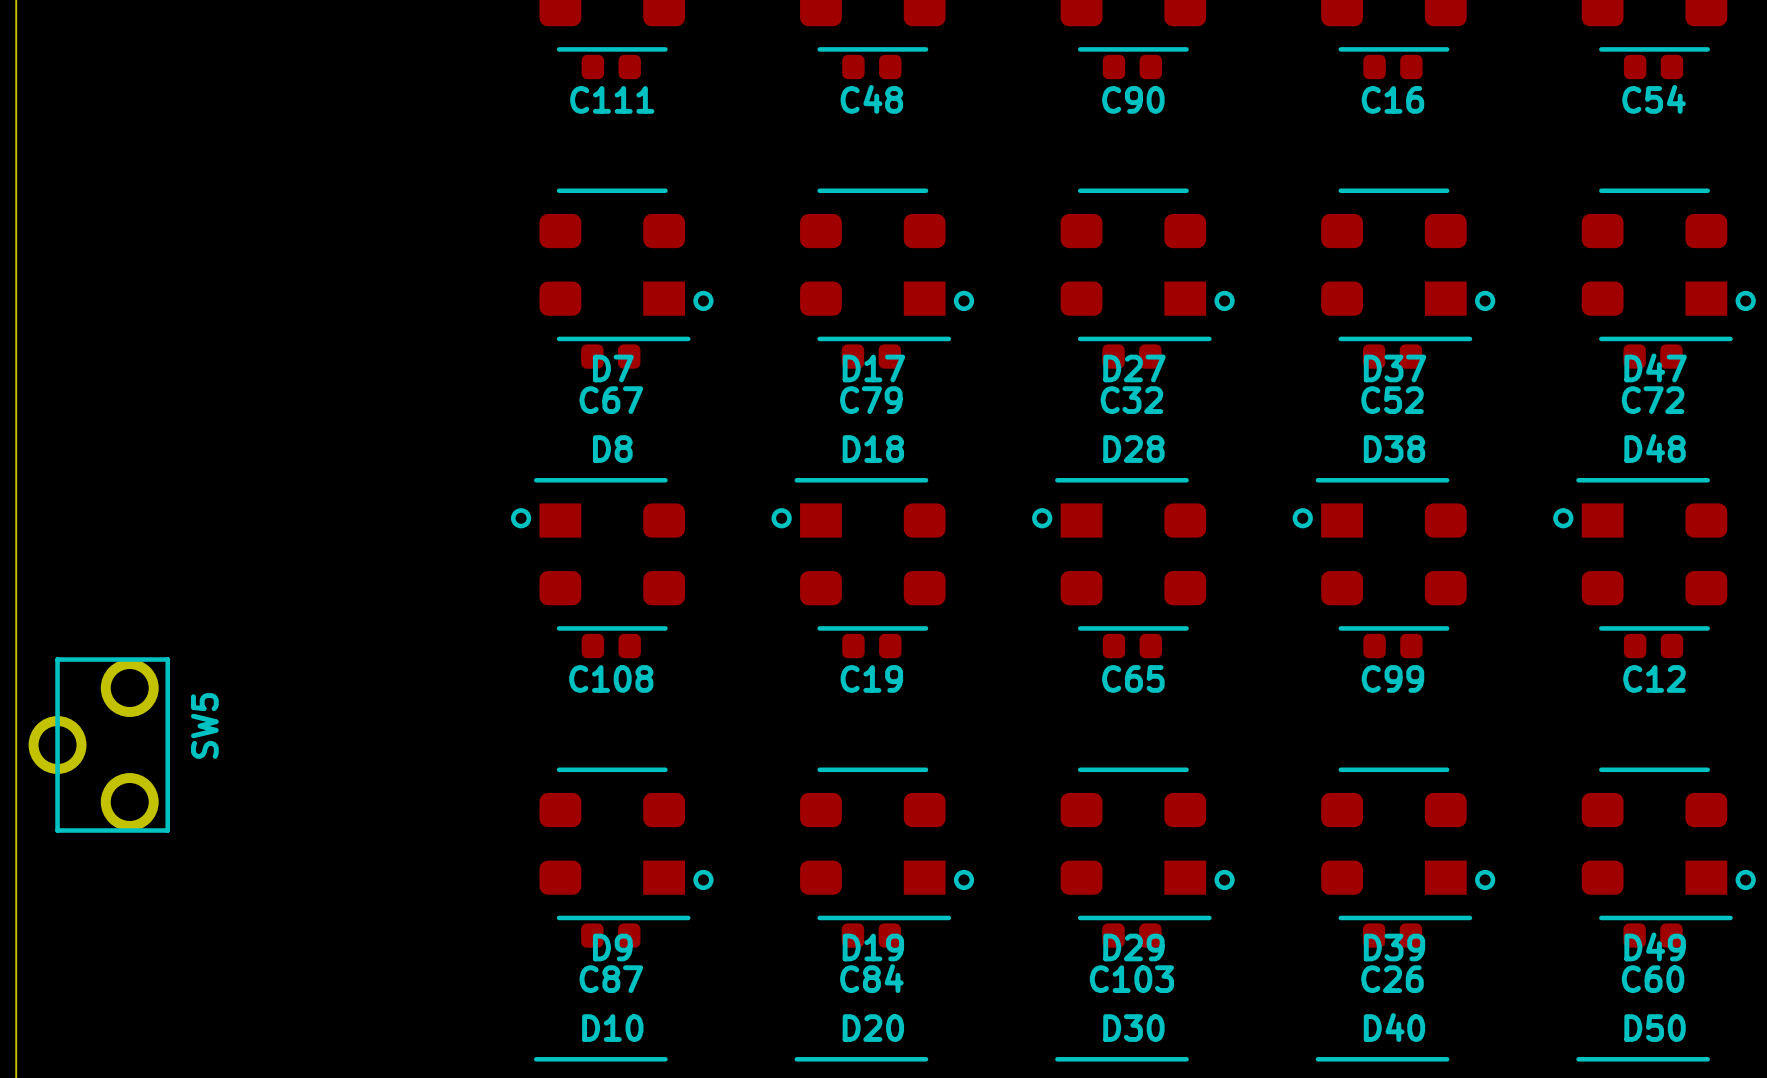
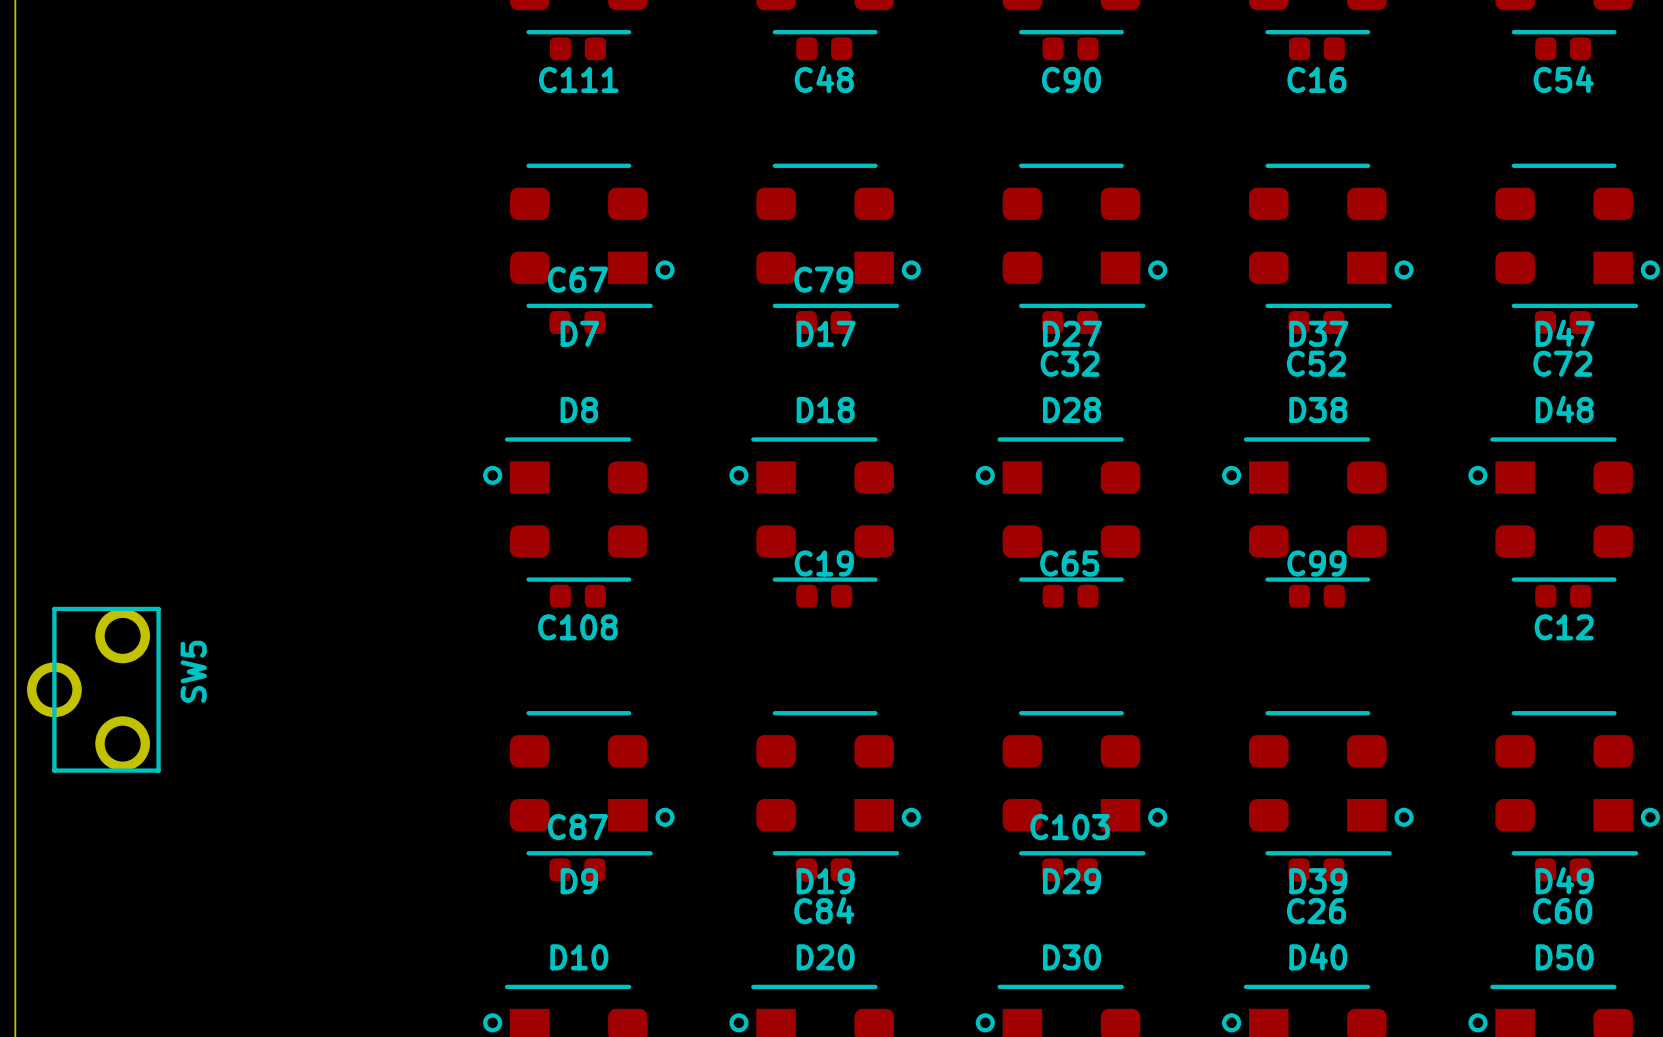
C67 name position: C67 (611, 400) -> C67 (577, 279)
C79 name position: C79 (871, 400) -> C79 (823, 279)
C19 name position: C19 (871, 678) -> C19 (824, 563)
C65 name position: C65 (1133, 678) -> C65 (1069, 563)
C99 name position: C99 (1392, 678) -> C99 (1316, 563)
C87 name position: C87 (611, 979) -> C87 (577, 827)
C103 name position: C103 (1131, 979) -> C103 (1070, 827)

